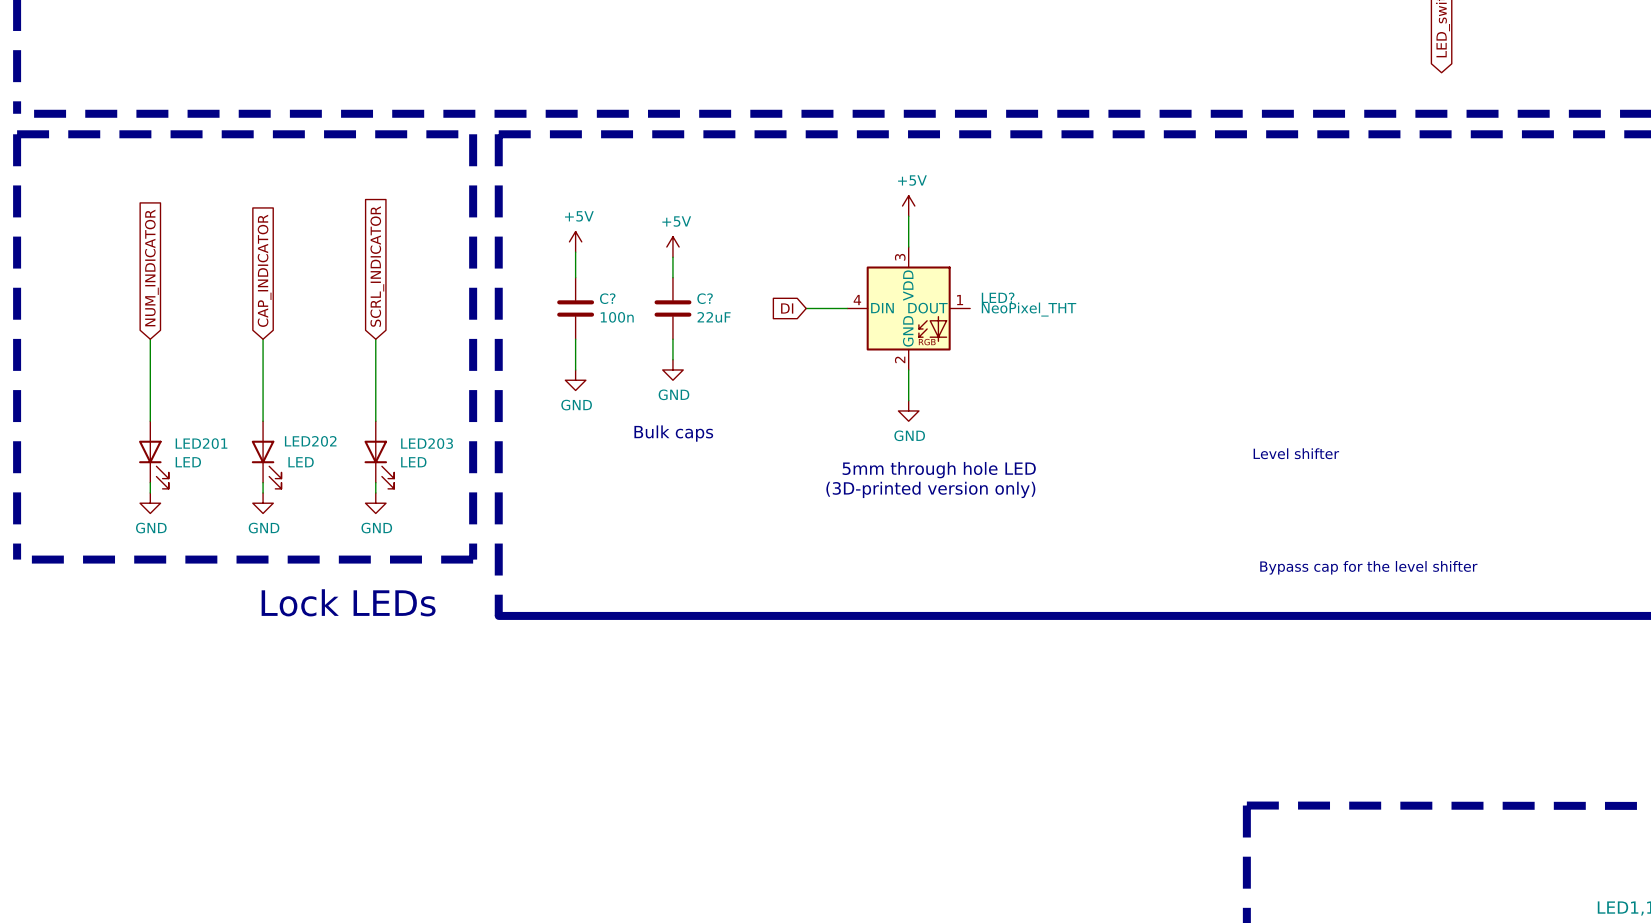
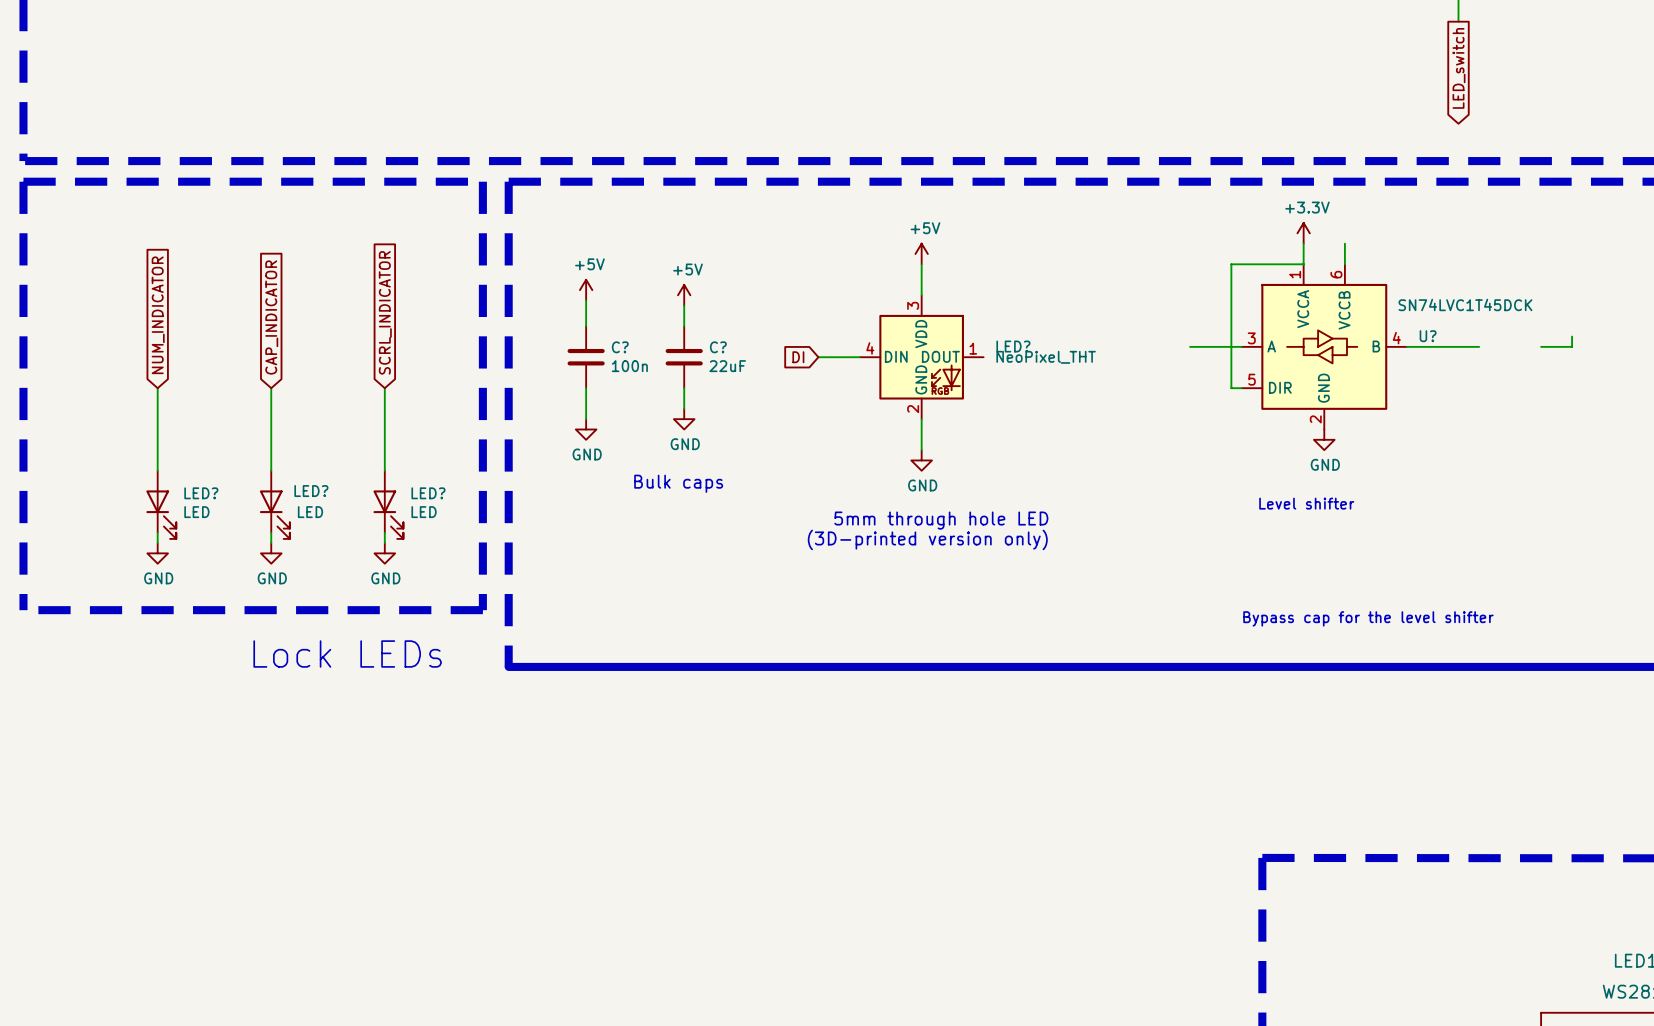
power symbol: none -> +3.3V (1303, 233)
wire: none -> (1303, 243) (1303, 264) (1231, 264) (1231, 388) (1241, 388)
wire: none -> (1344, 243) (1344, 264)
wire: none -> (1572, 336) (1572, 346) (1541, 346)
wire: none -> (1190, 346) (1241, 346)
U?: none -> SN74LVC1T45DCK (1324, 346)
wire: none -> (1406, 346) (1479, 346)
power symbol: none -> GND (1324, 439)
LED202 name: LED202 (310, 441) -> LED? (311, 491)
LED201 name: LED201 (201, 443) -> LED? (201, 493)
LED203 name: LED203 (427, 443) -> LED? (428, 493)

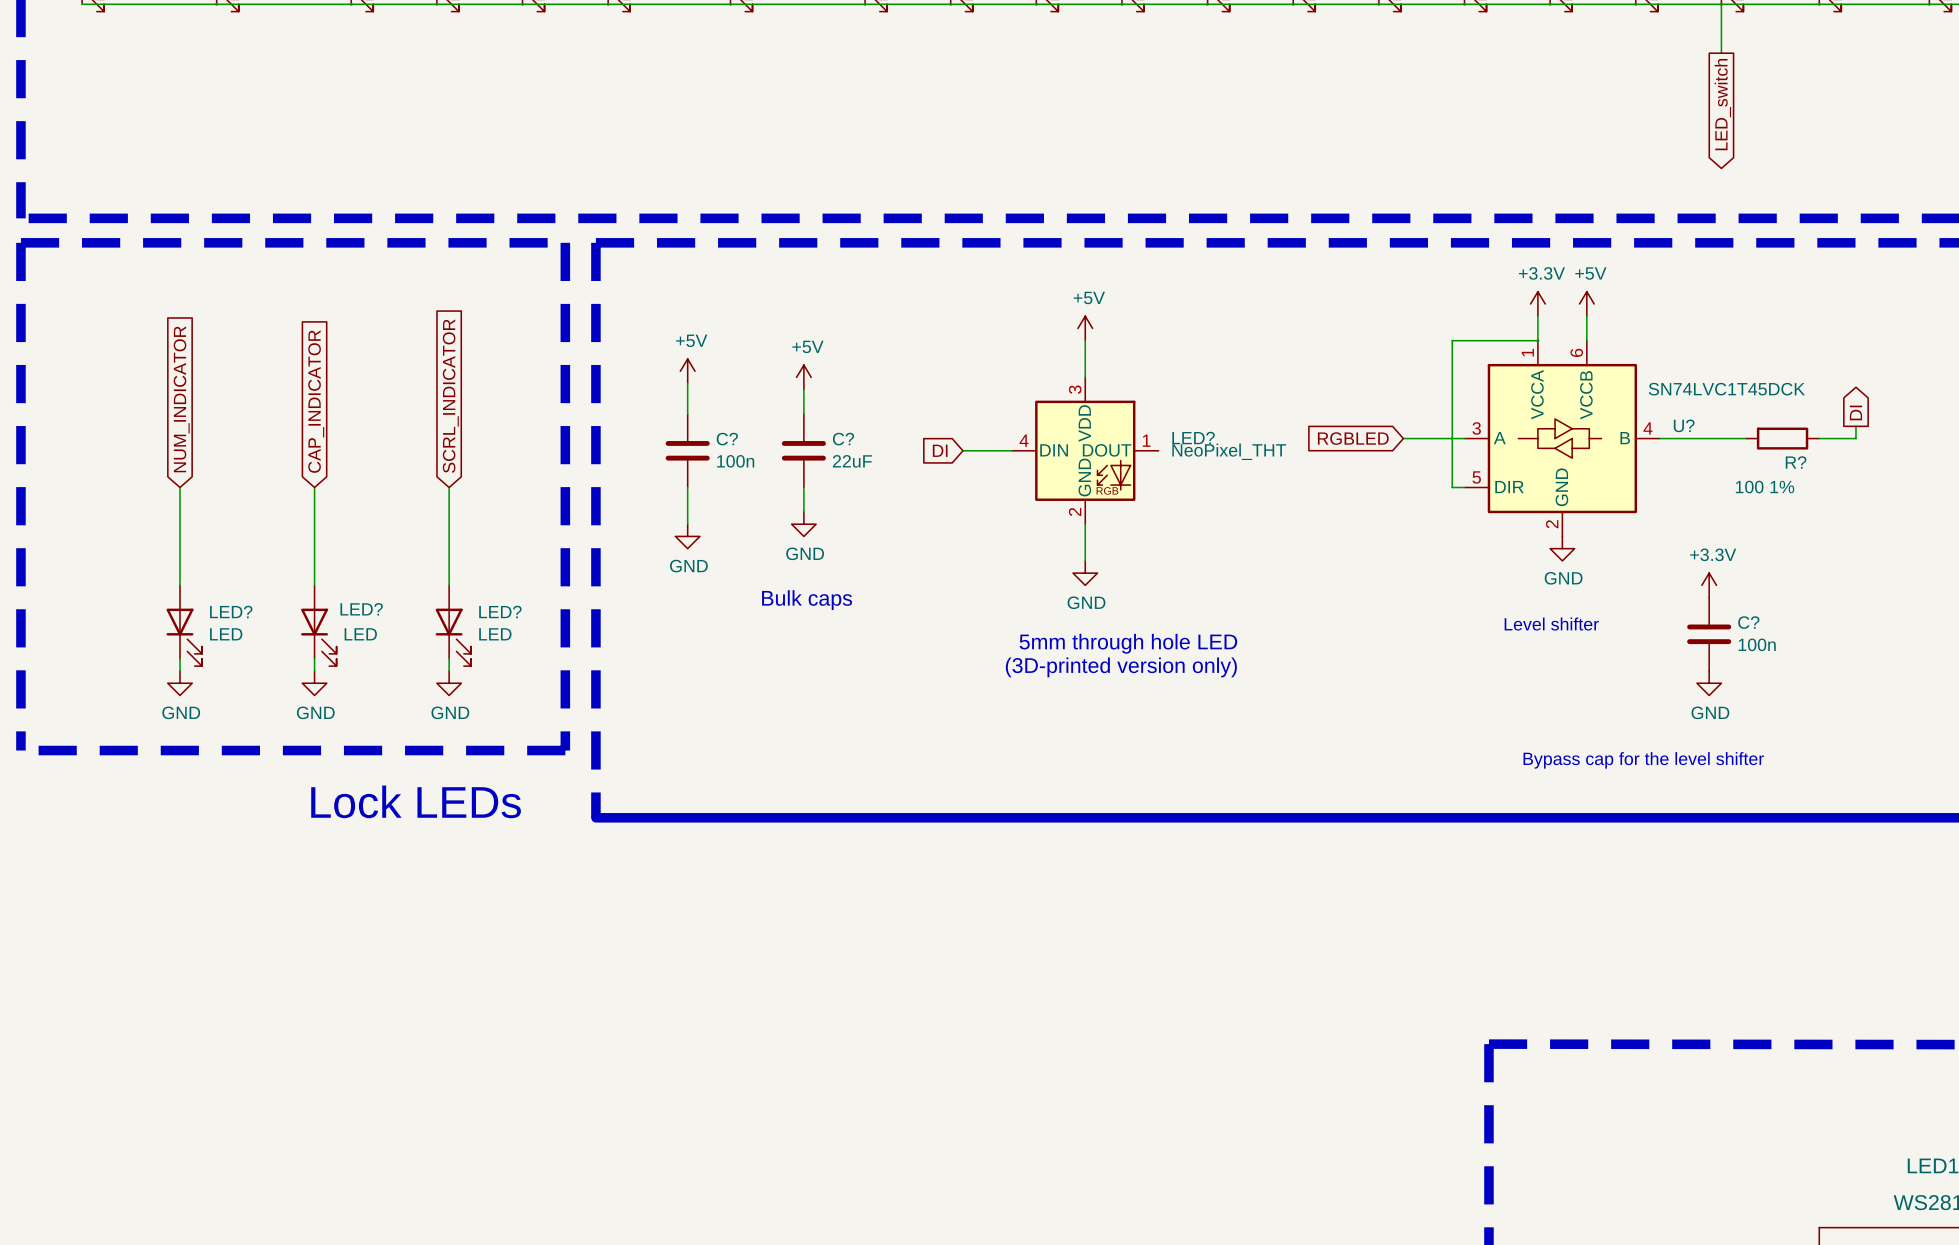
power symbol: none -> +5V (1586, 303)
global label: none -> DI (1855, 412)
global label: none -> RGBLED (1353, 438)
R?: none -> 100 1% (1782, 438)
power symbol: none -> +3.3V (1709, 585)
C?: none -> 100n (1709, 634)
power symbol: none -> GND (1709, 683)

